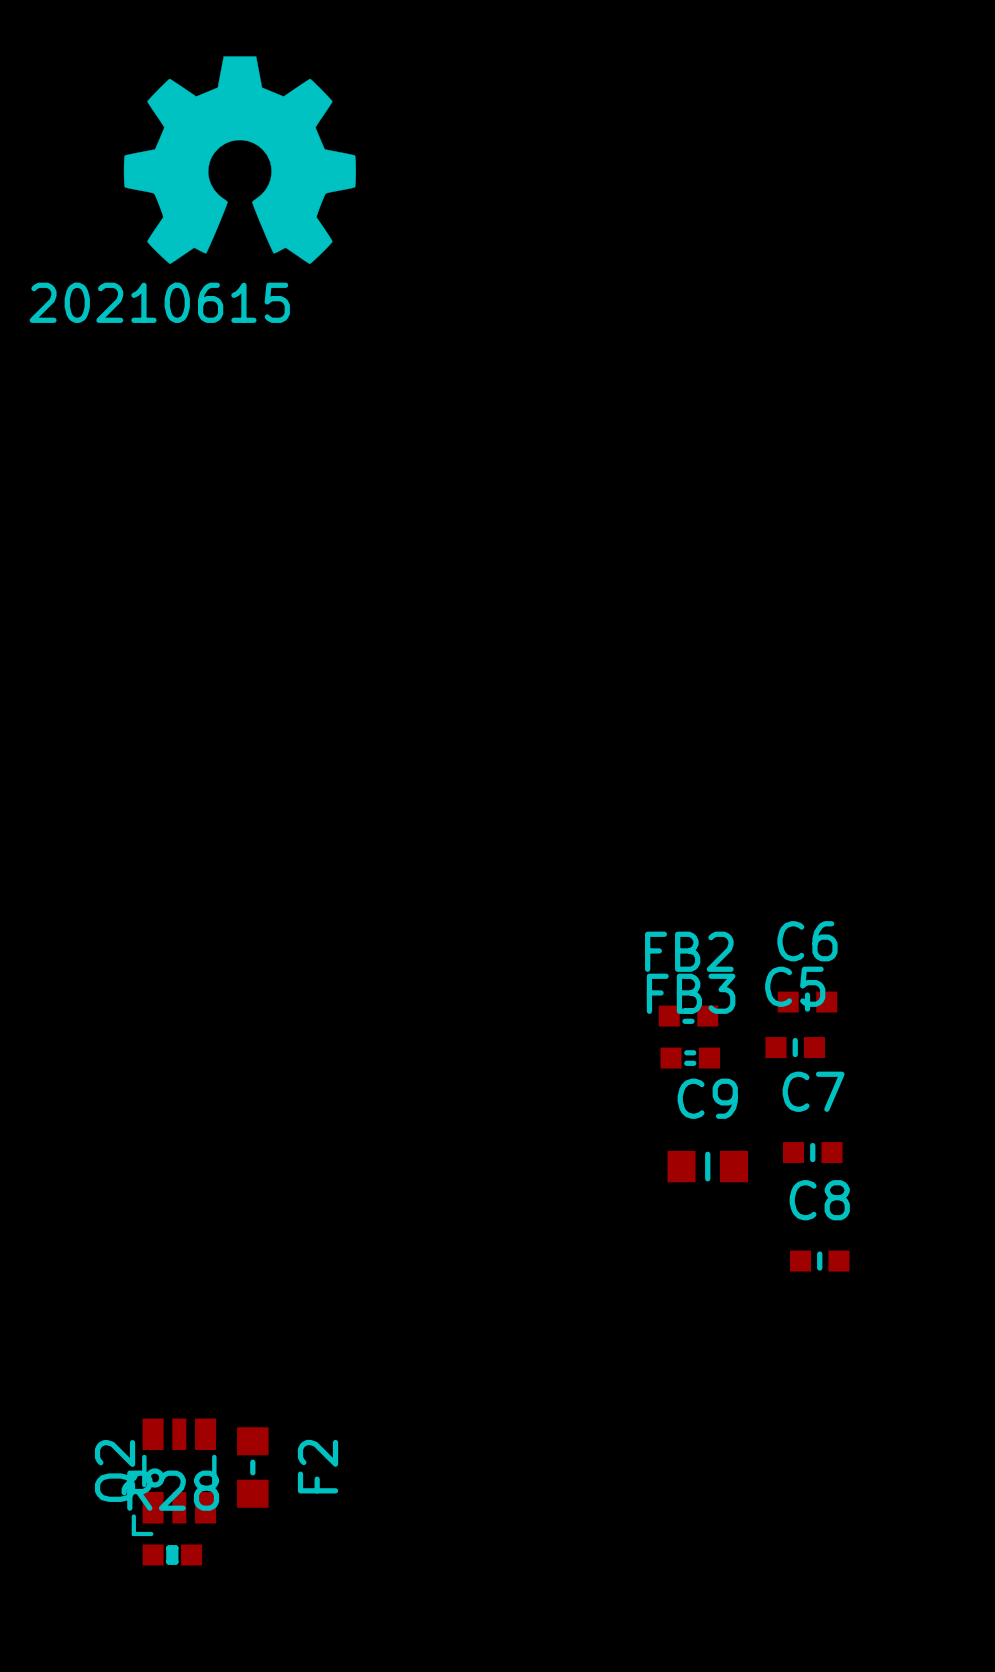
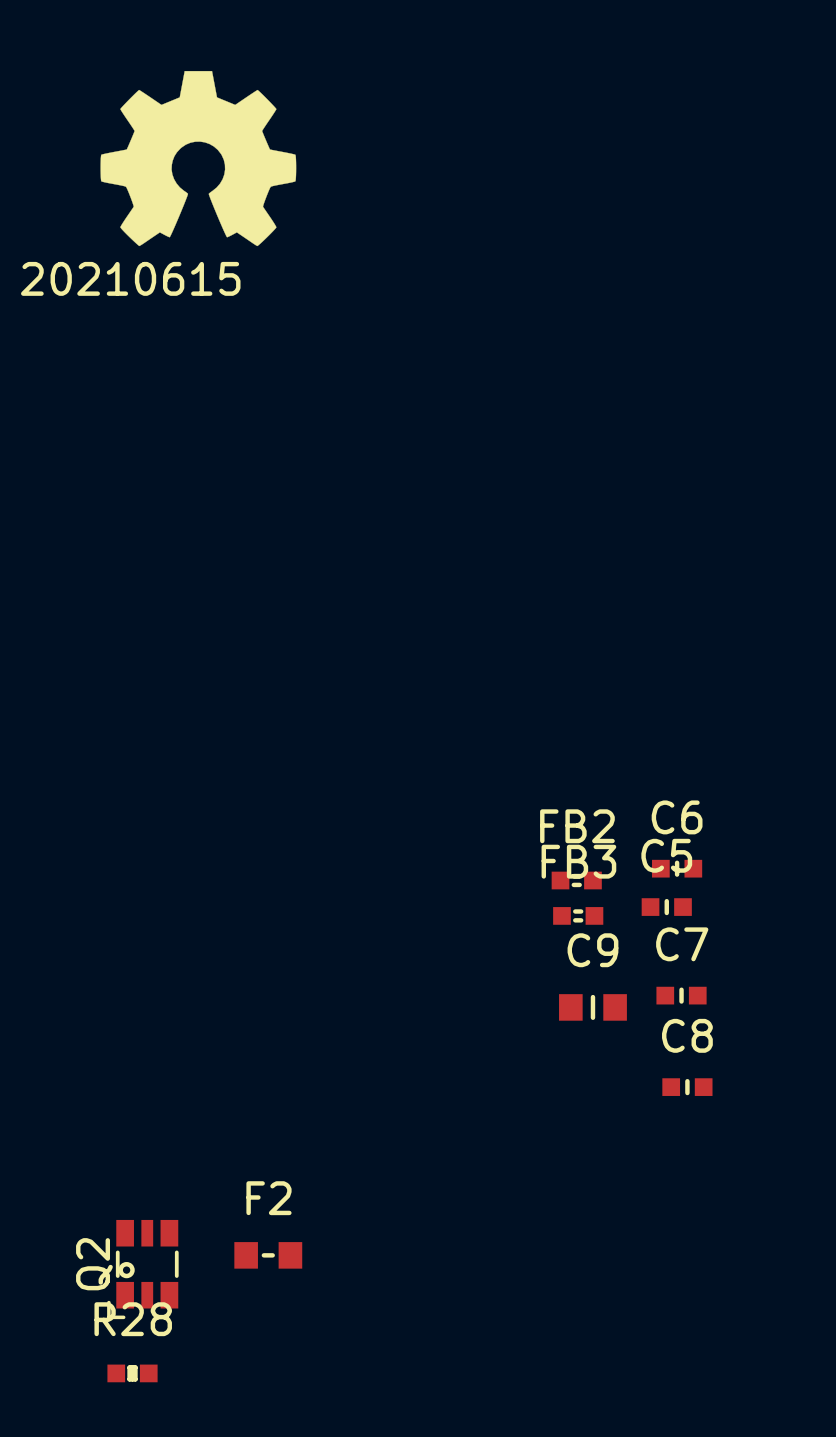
F2 name position: F2 (318, 1466) -> F2 (268, 1198)
F2 rotation: 0° (252, 1467) -> 90° clockwise (268, 1255)
F2 position: (252, 1467) -> (268, 1255)
R28 position: (172, 1554) -> (132, 1373)

